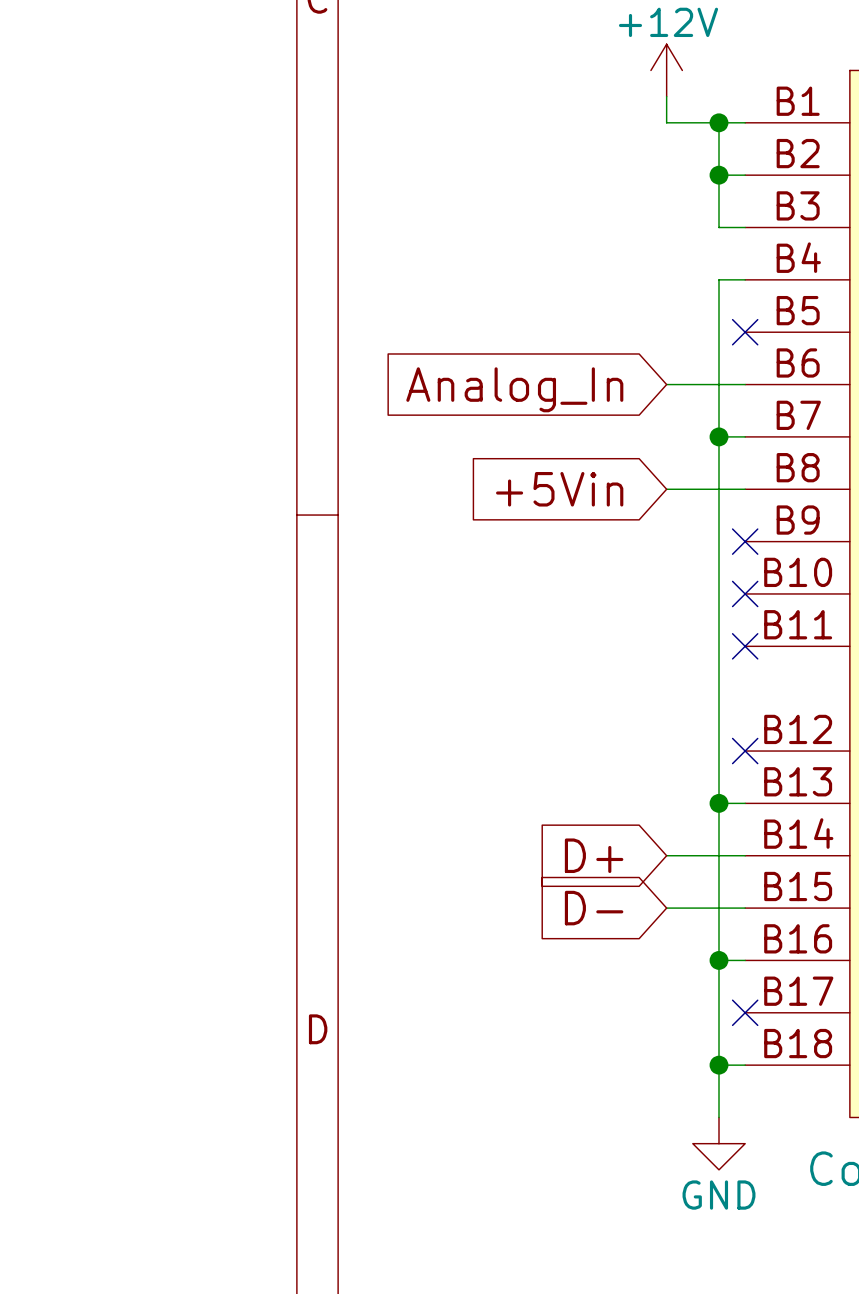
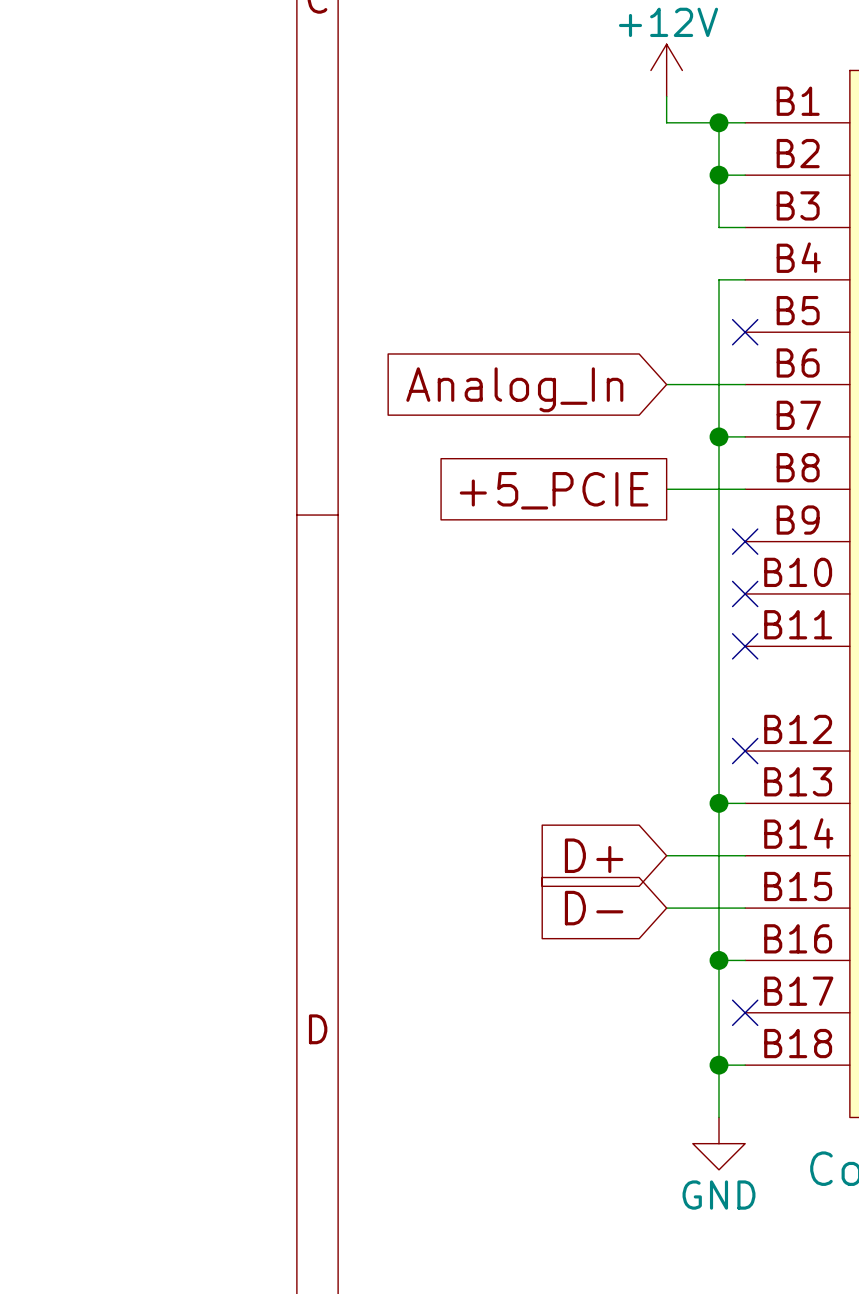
global label shape: input (559, 489) -> passive (554, 490)
global label: +5Vin (559, 489) -> +5_PCIE (554, 490)

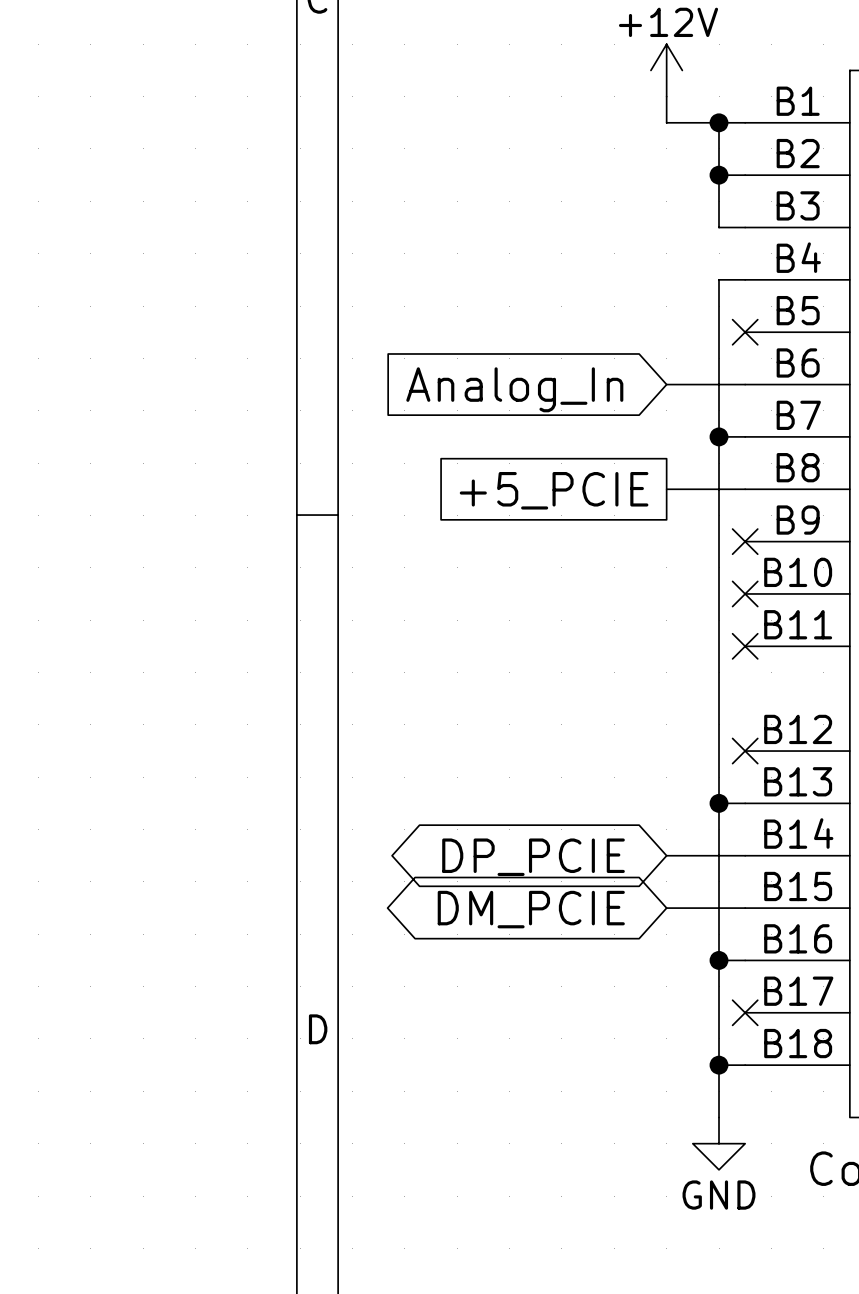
global label shape: input (594, 855) -> bidirectional (533, 857)
global label: D+ (594, 855) -> DP_PCIE (533, 857)
global label shape: input (594, 908) -> bidirectional (531, 909)
global label: D- (594, 908) -> DM_PCIE (531, 909)

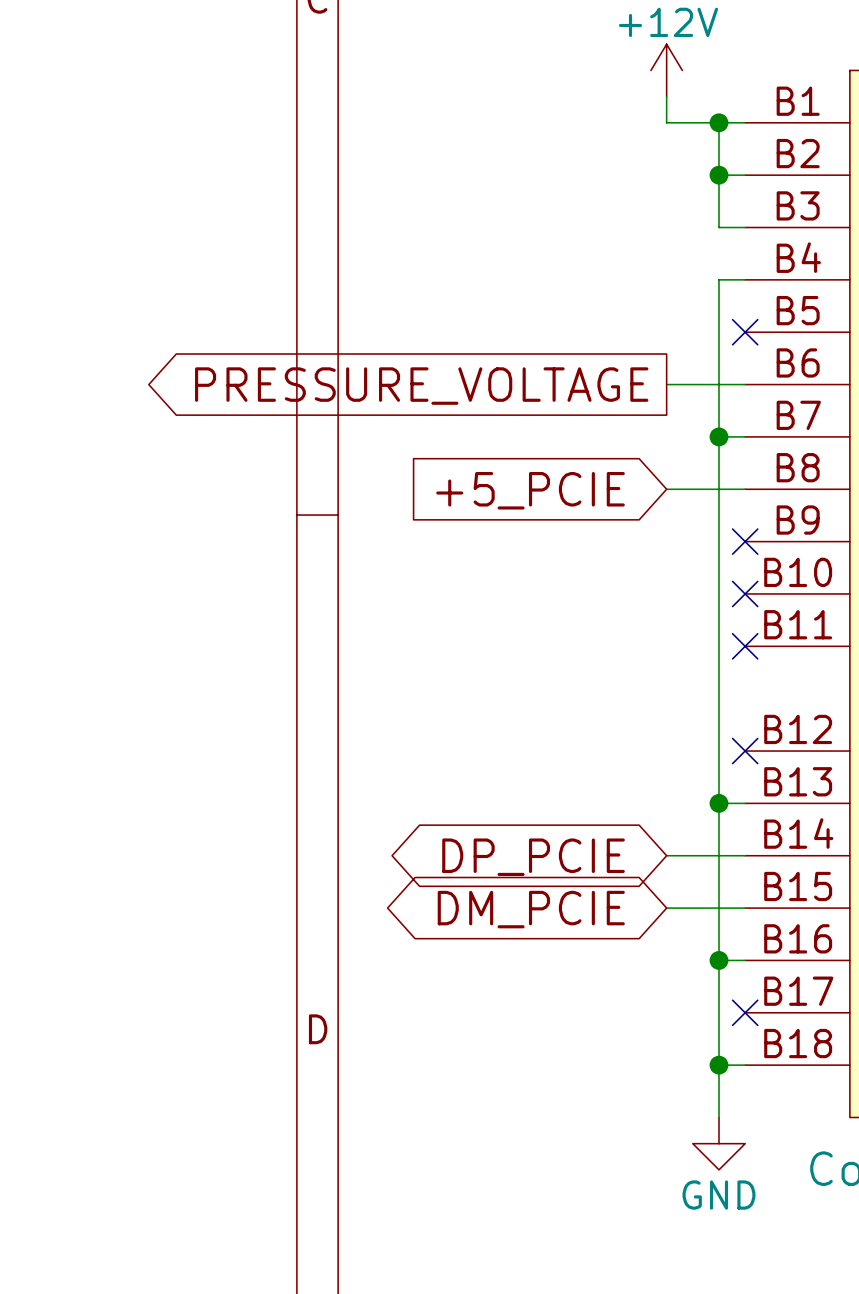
global label shape: input (514, 389) -> output (421, 386)
global label: Analog_In (514, 389) -> PRESSURE_VOLTAGE (421, 386)
global label shape: passive (554, 490) -> input (530, 490)

